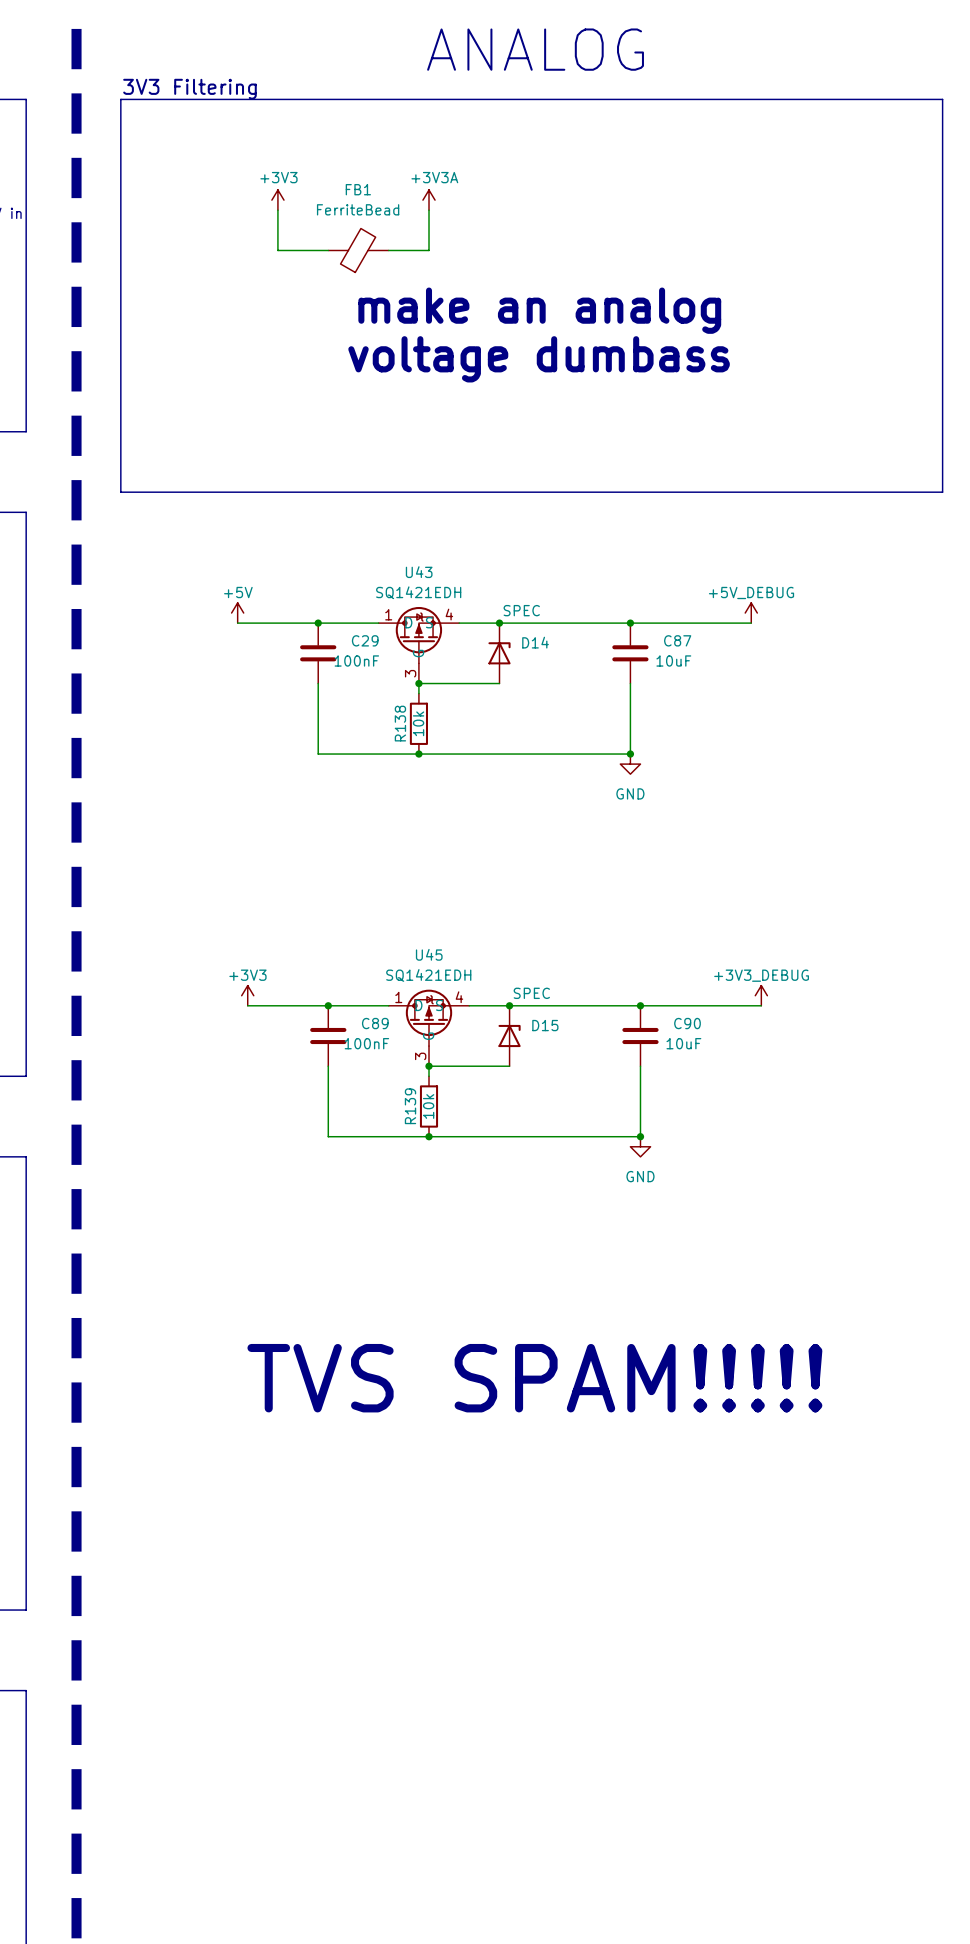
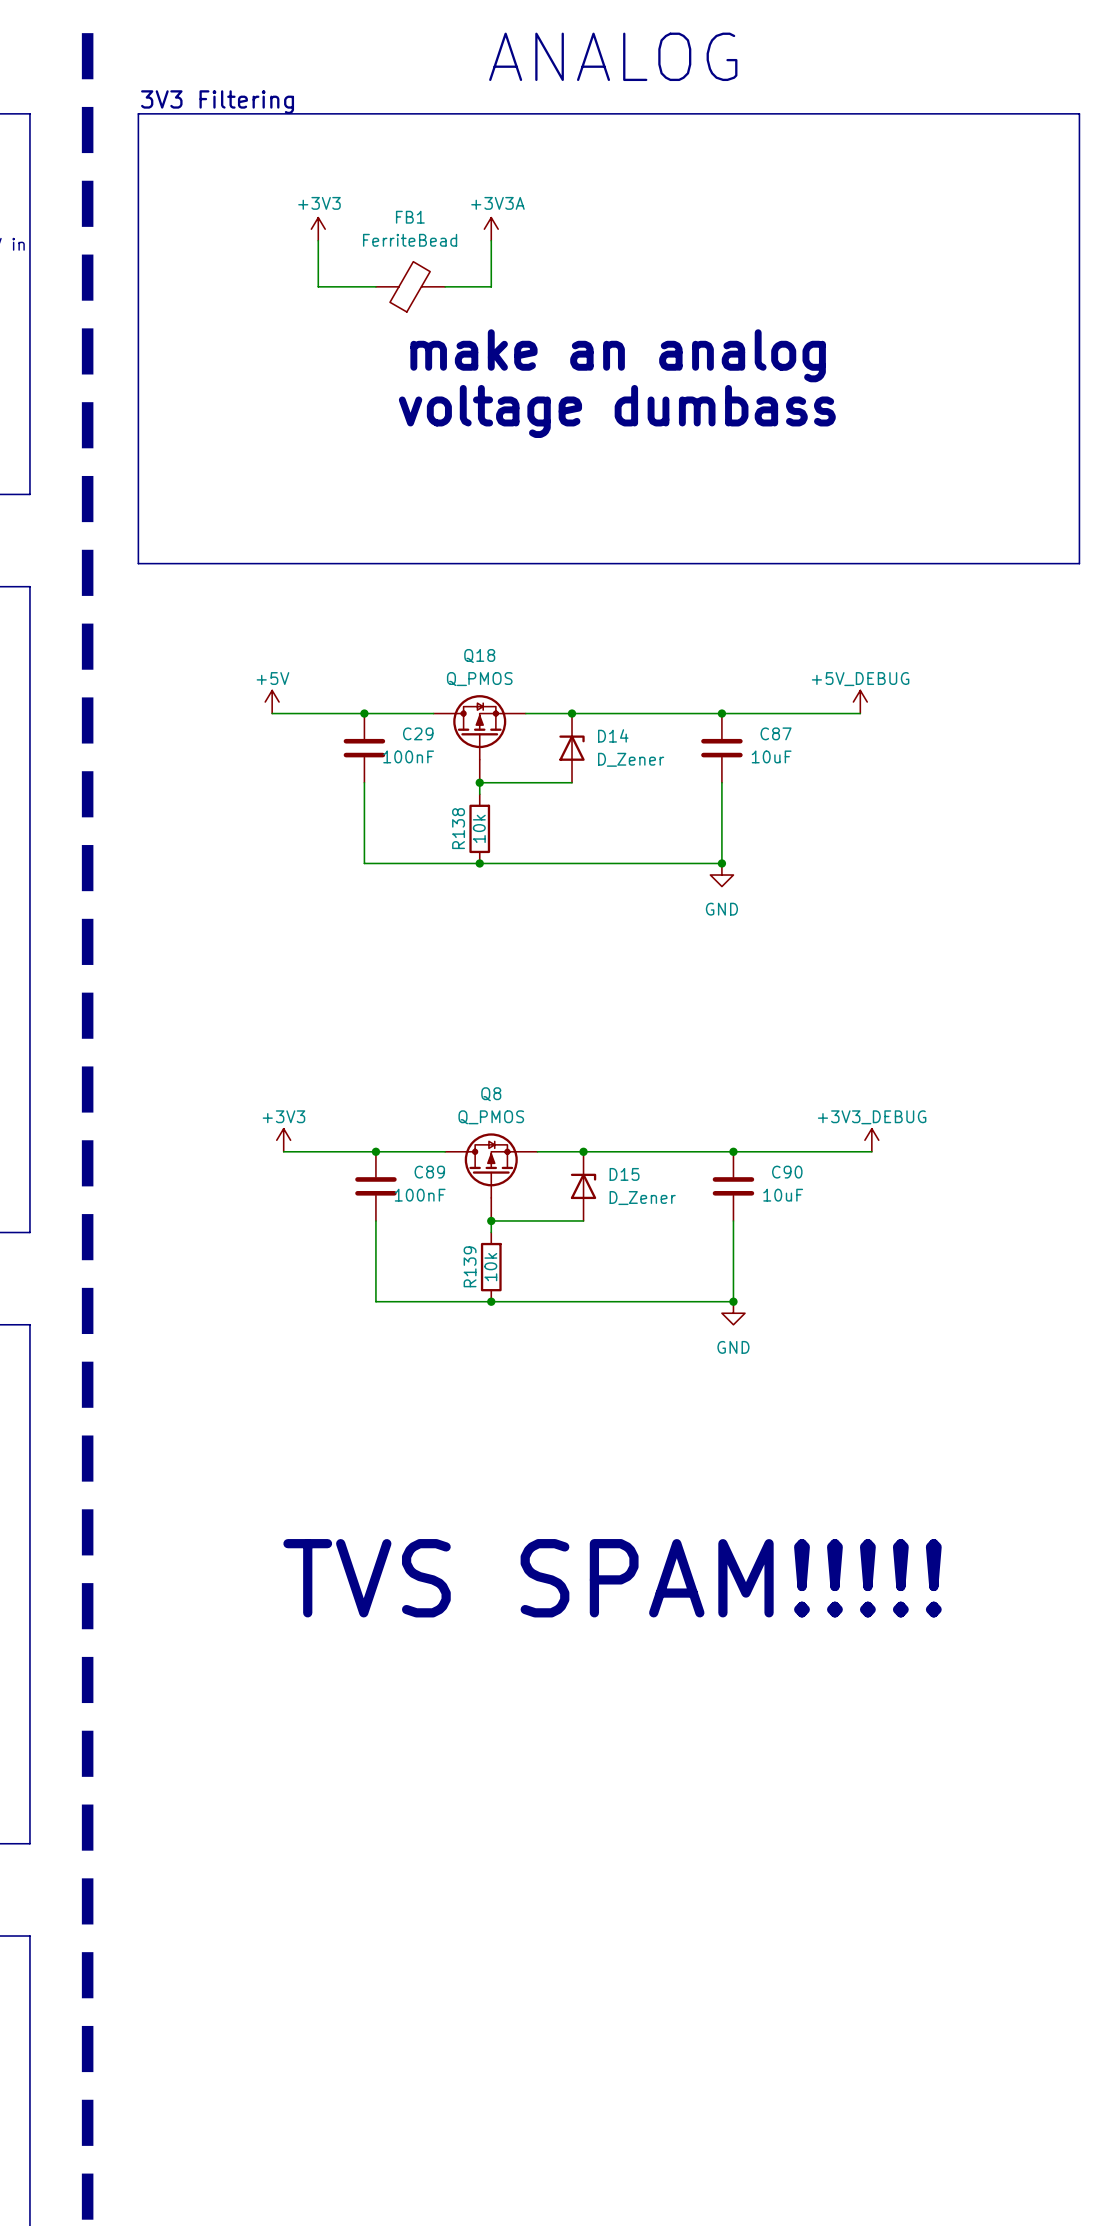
D14 value: SPEC (521, 610) -> D_Zener (631, 759)
U43: SQ1421EDH (418, 645) -> none
Q18: none -> Q_PMOS (479, 738)
D15 value: SPEC (531, 993) -> D_Zener (642, 1198)
U45: SQ1421EDH (429, 1027) -> none
Q8: none -> Q_PMOS (491, 1177)

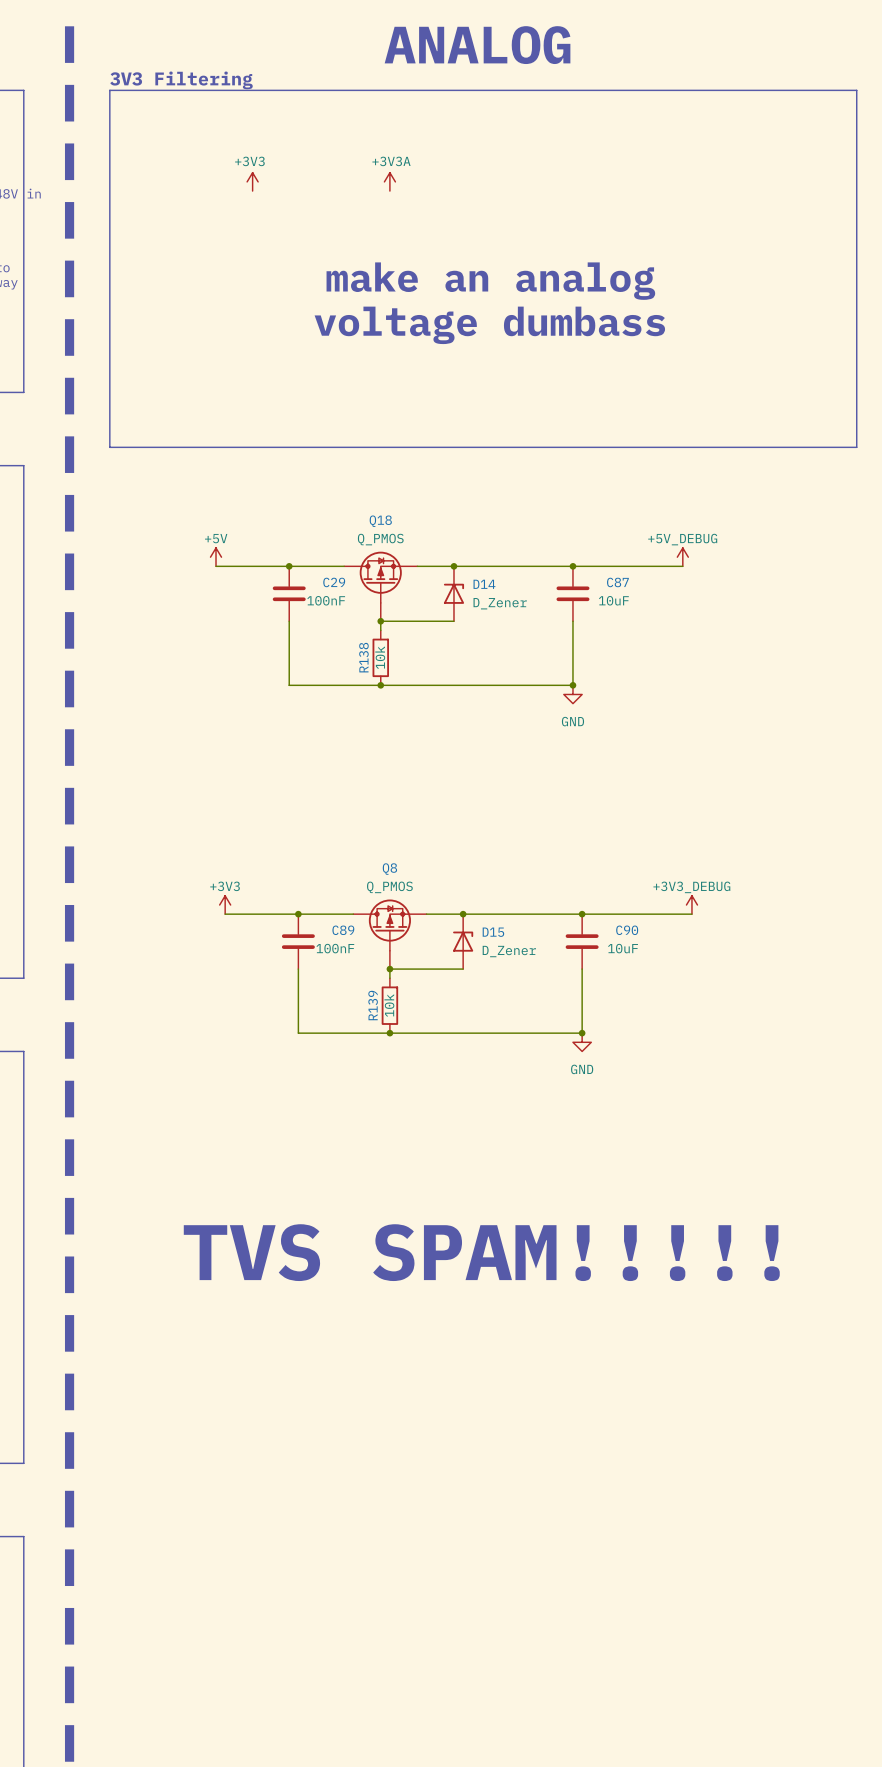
wire: (318, 240) (318, 286) (375, 286) -> none
wire: (491, 240) (491, 286) (445, 286) -> none
FB1: FerriteBead (410, 286) -> none

